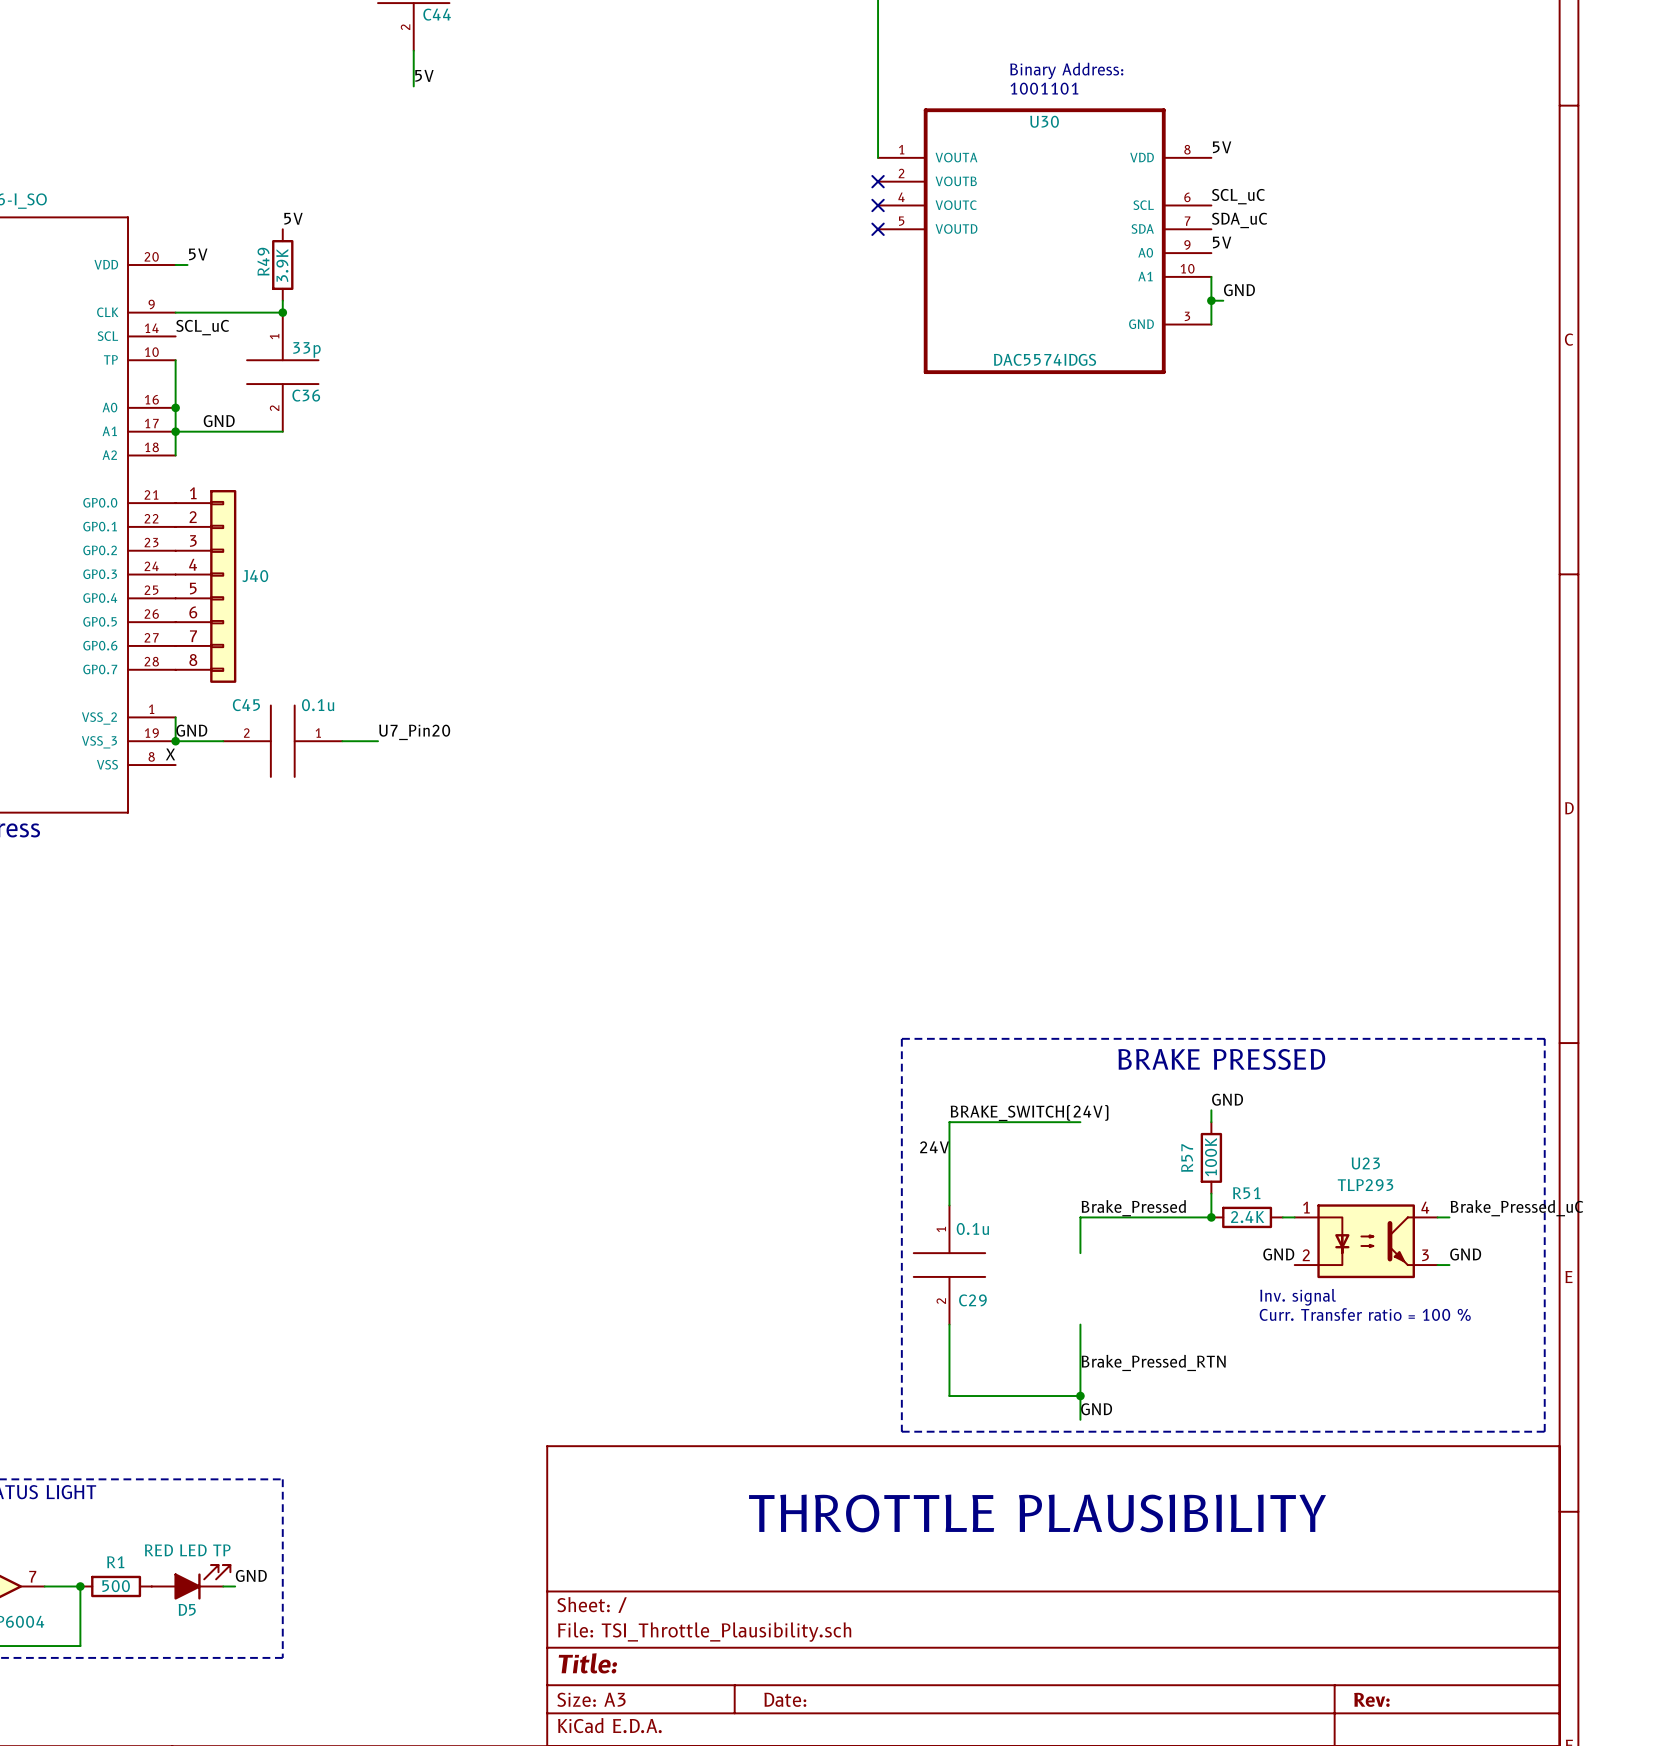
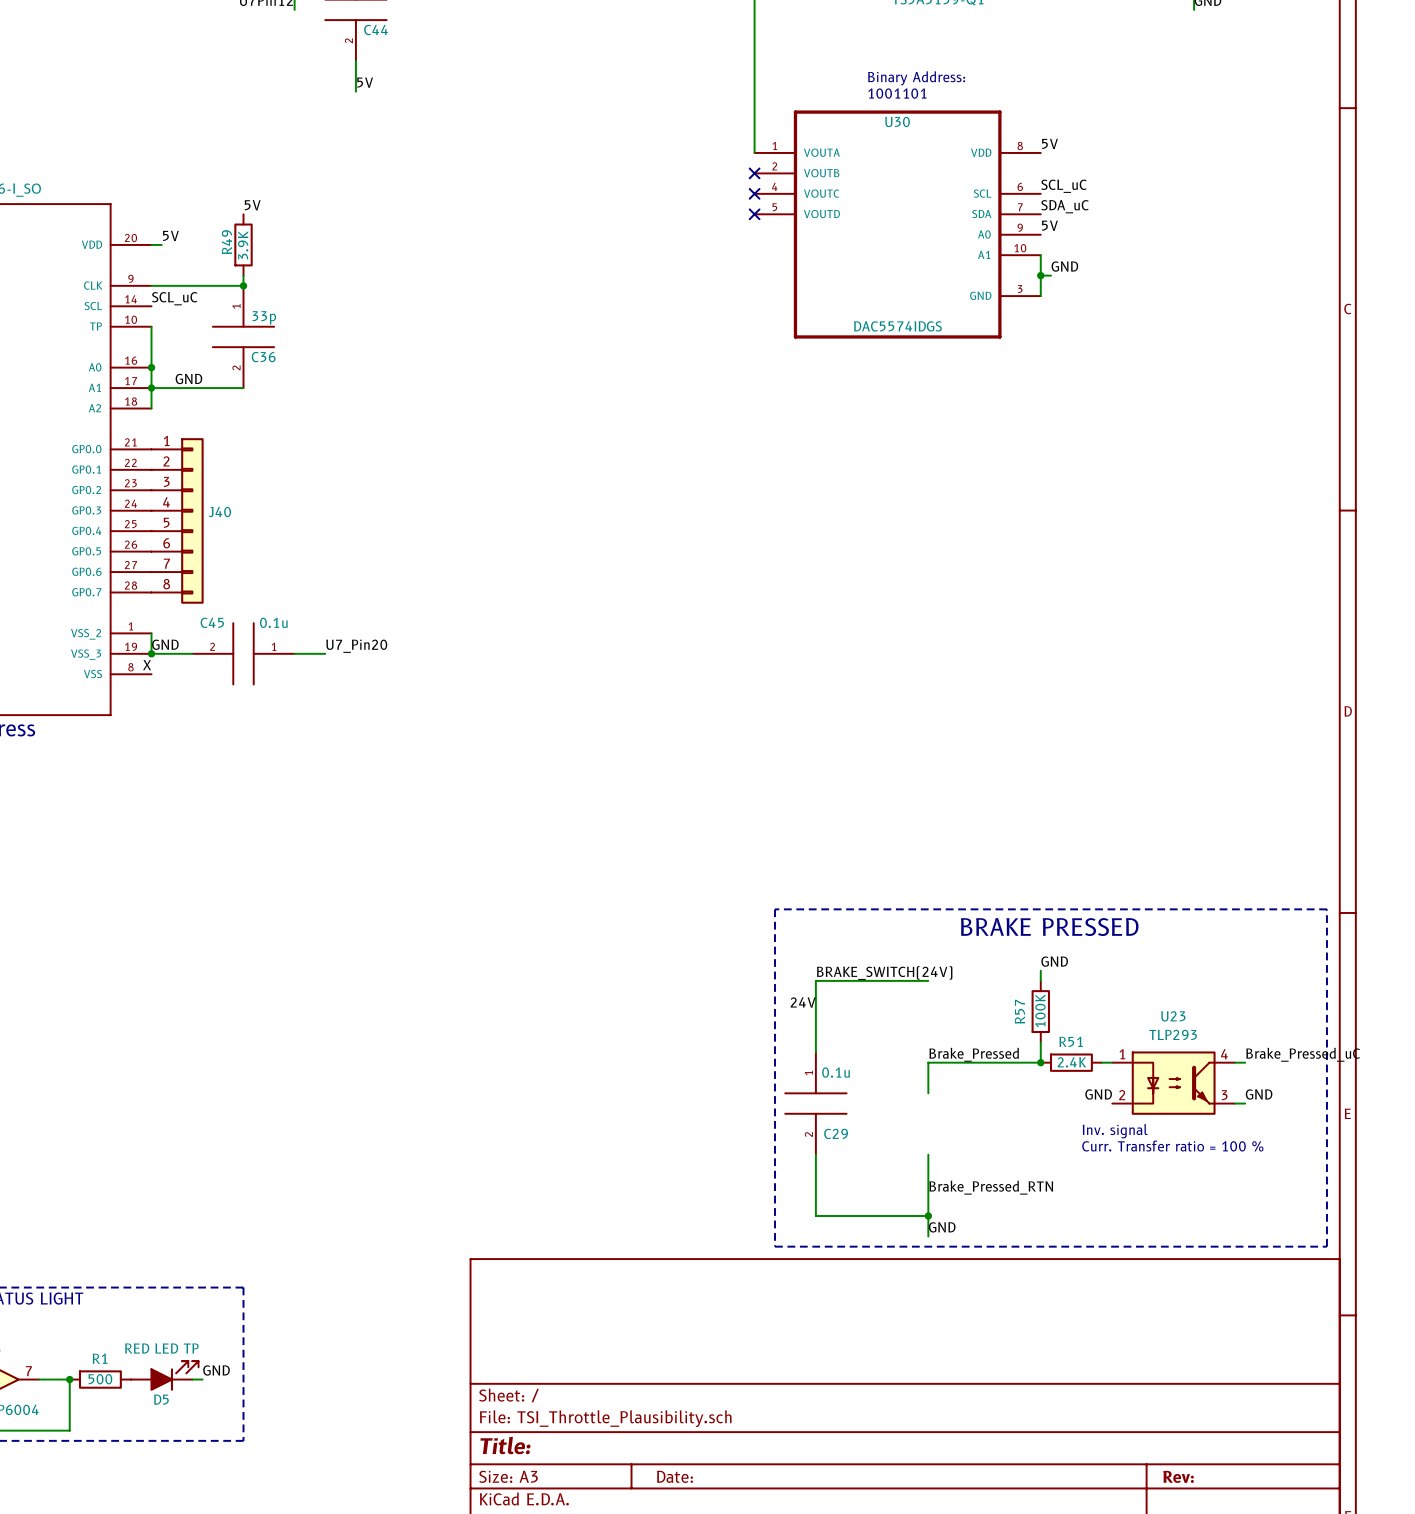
text: THROTTLE PLAUSIBILITY (1037, 1513) -> none

